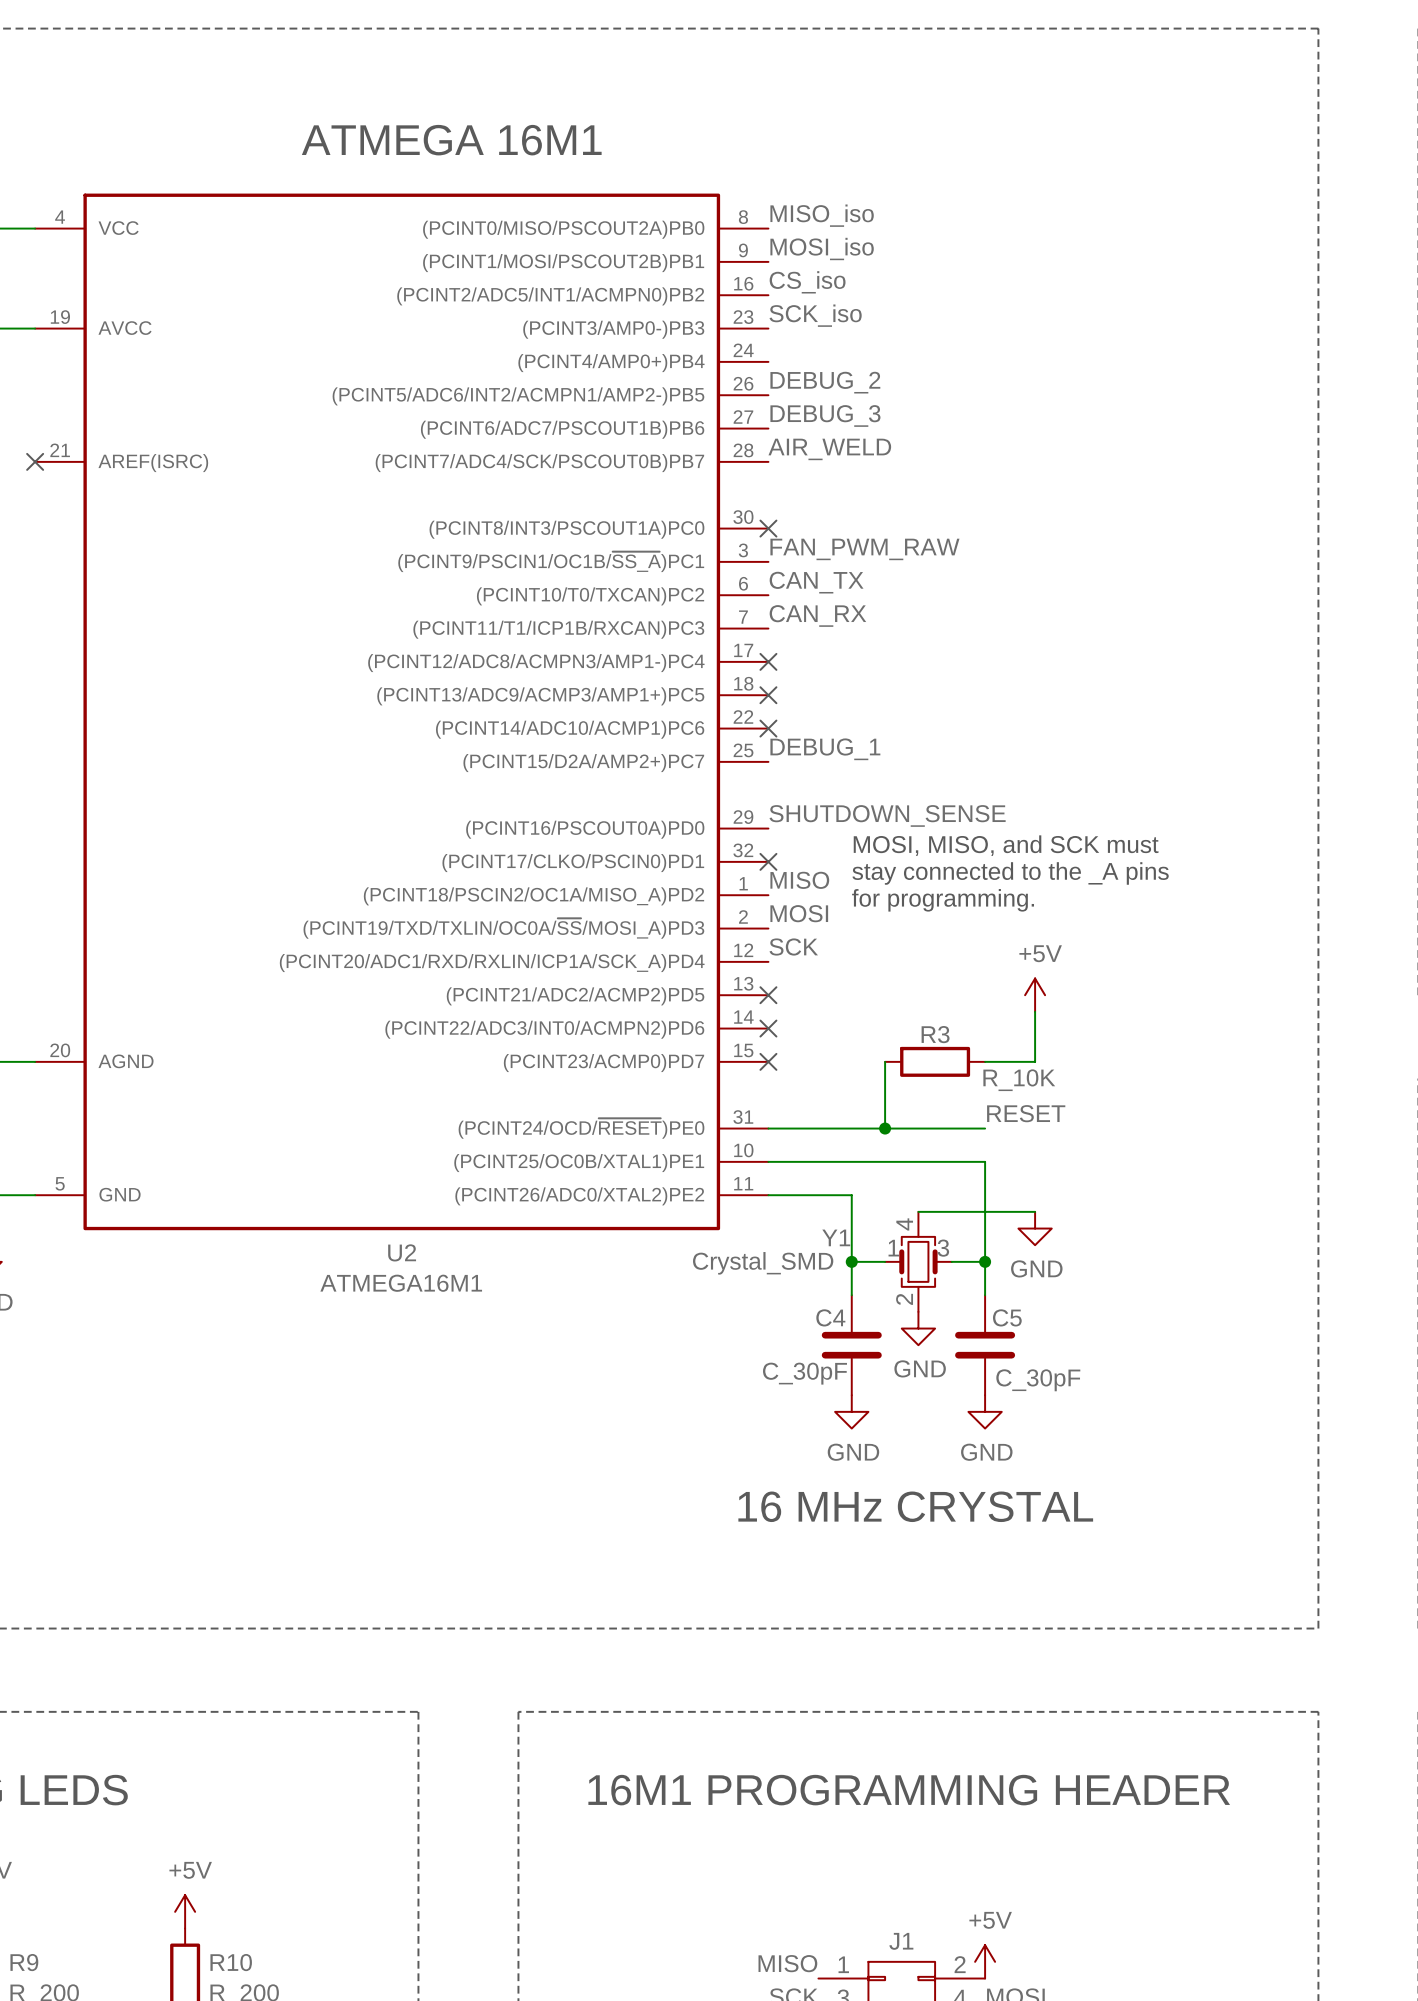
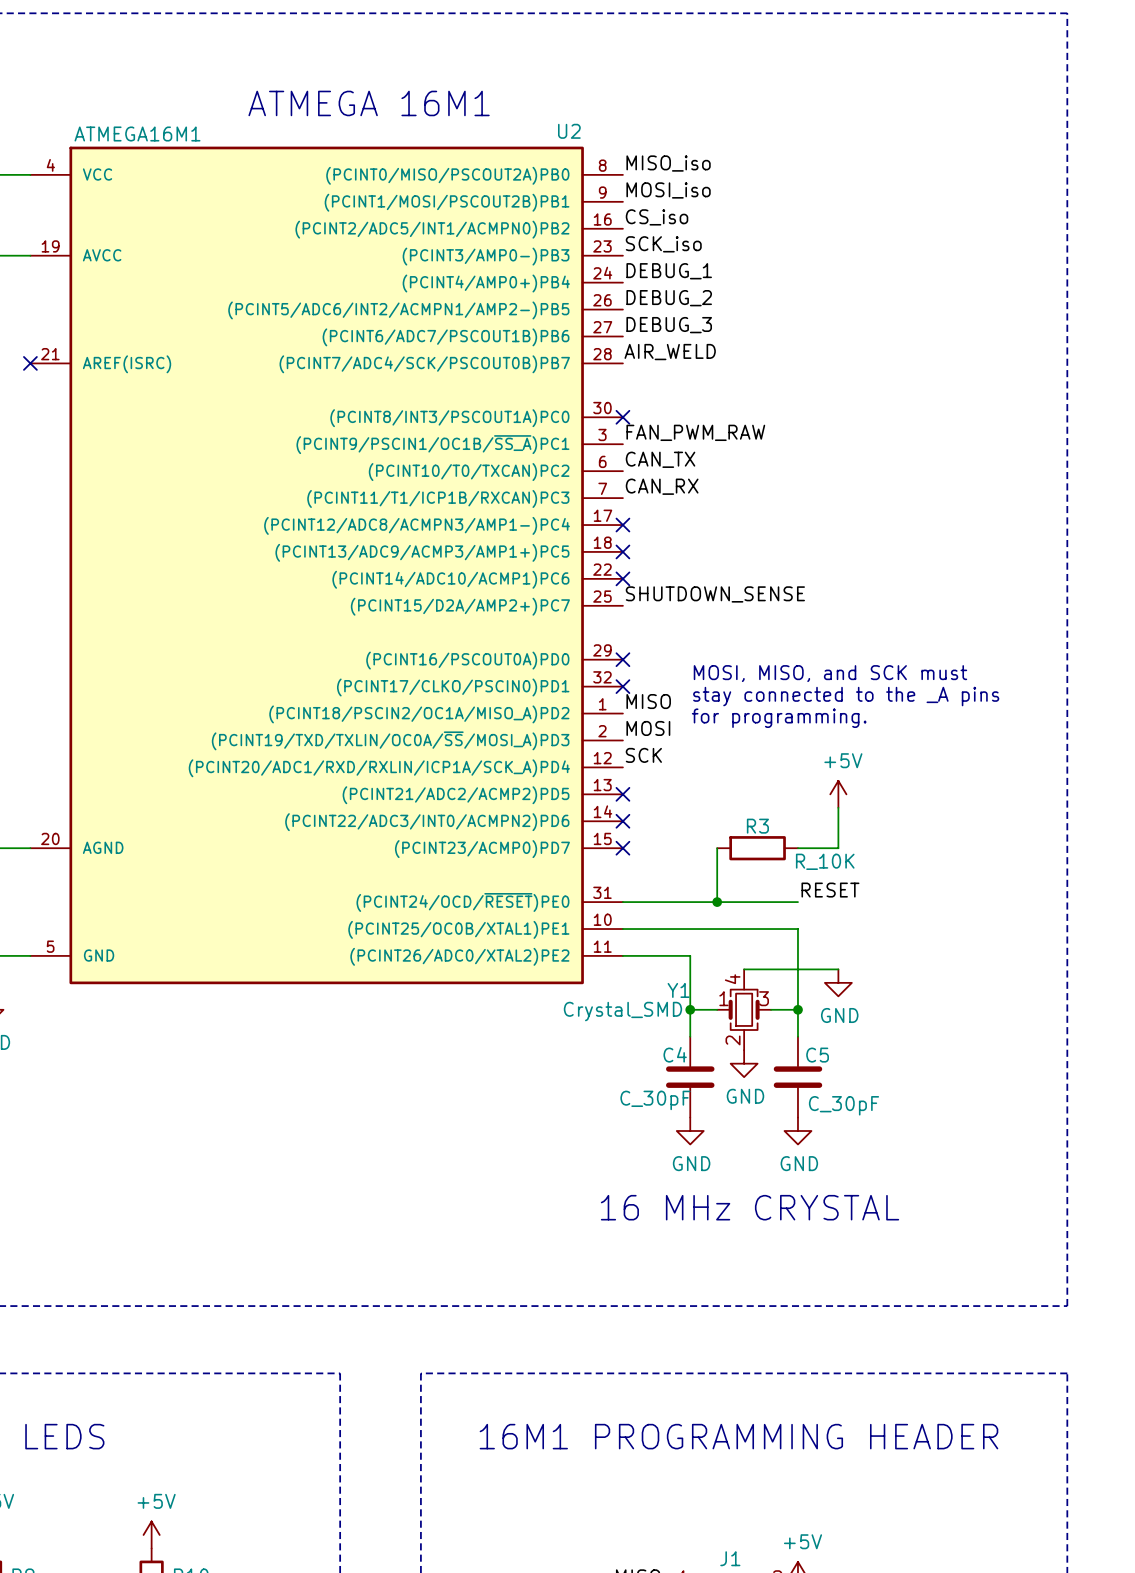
label: none -> DEBUG_1 (669, 271)
label: DEBUG_1 (825, 749) -> SHUTDOWN_SENSE (715, 594)
label: SHUTDOWN_SENSE (887, 815) -> none
no-connect mark: none -> (622, 659)
U2 name position: U2 (402, 1252) -> U2 (569, 131)
U2 value position: ATMEGA16M1 (401, 1283) -> ATMEGA16M1 (137, 134)

